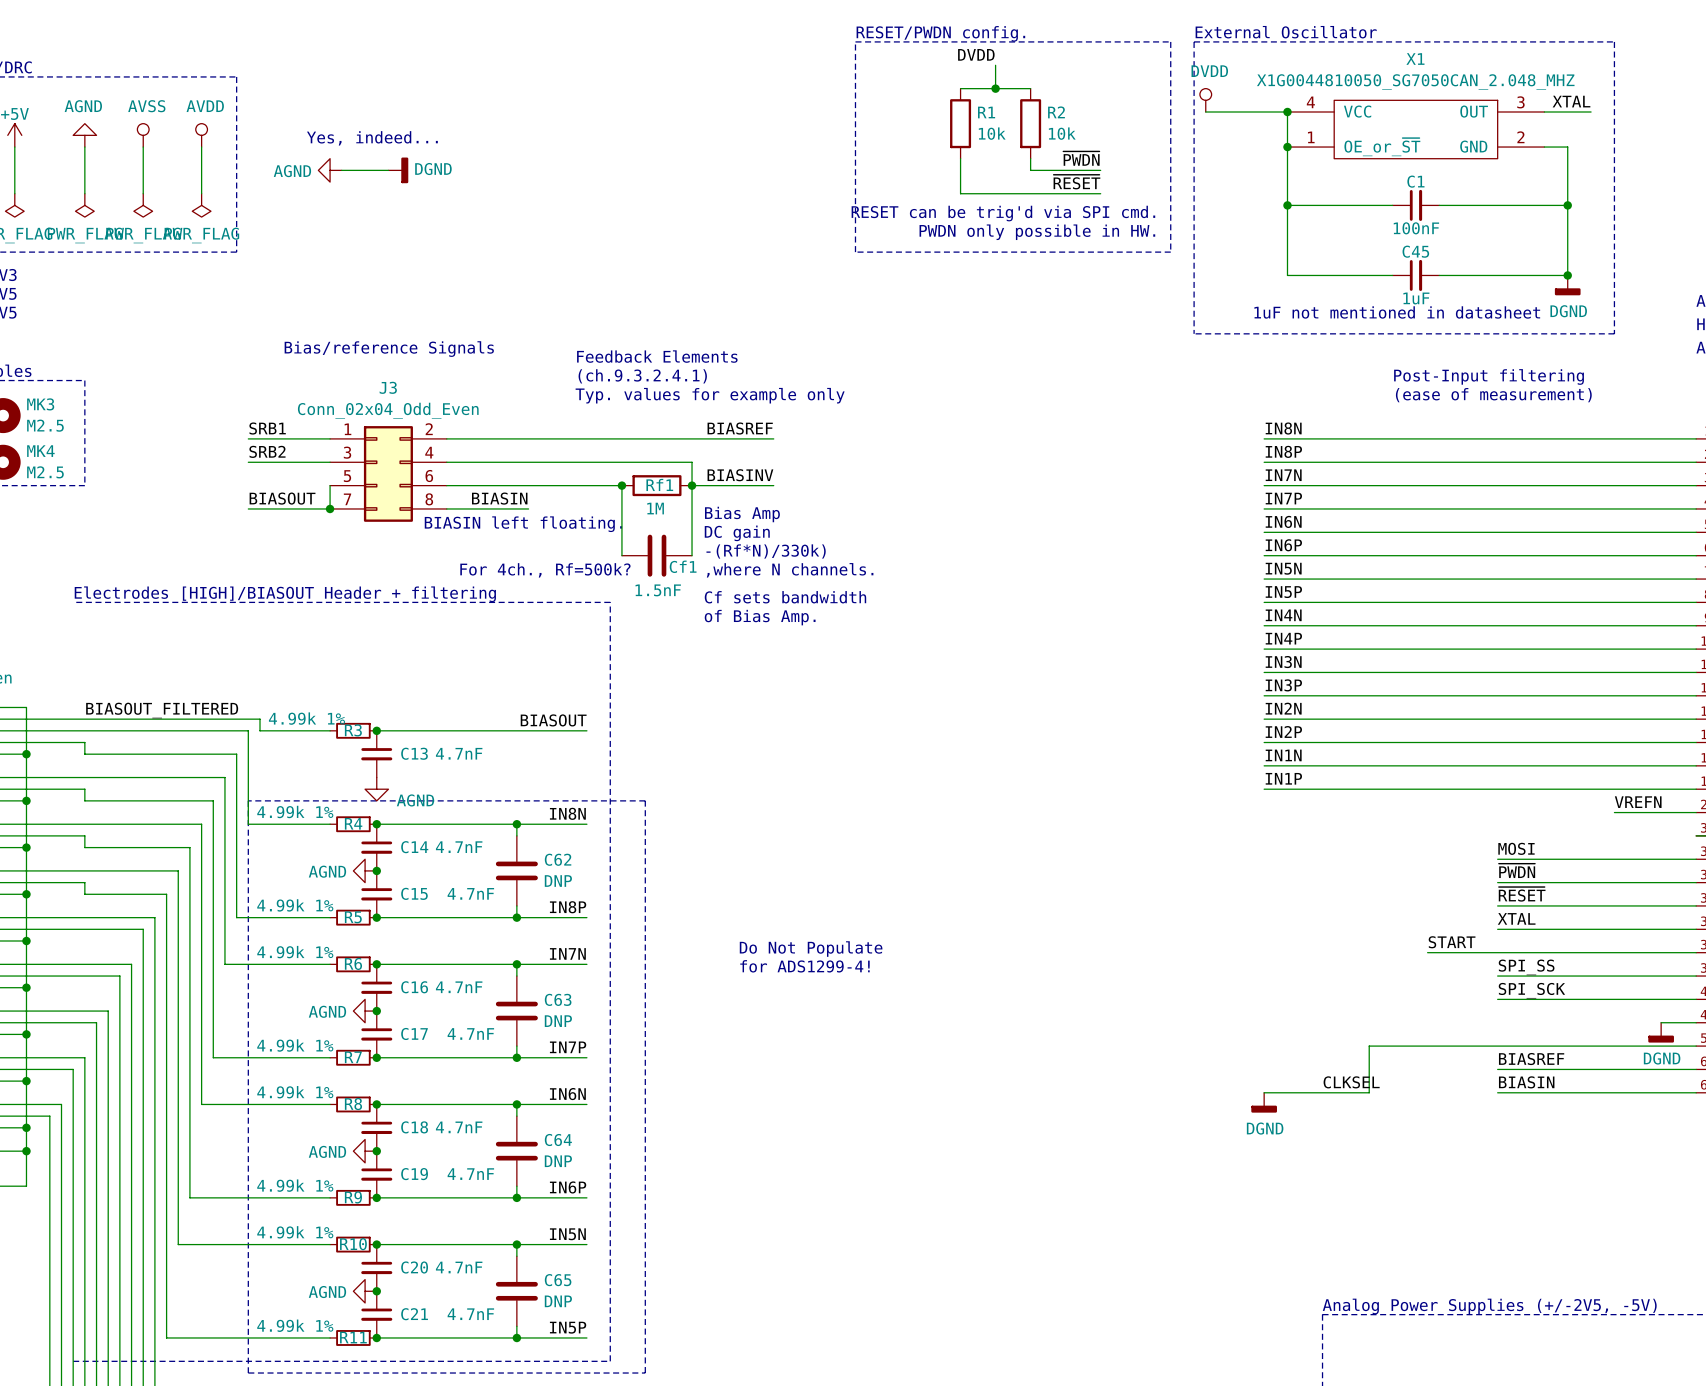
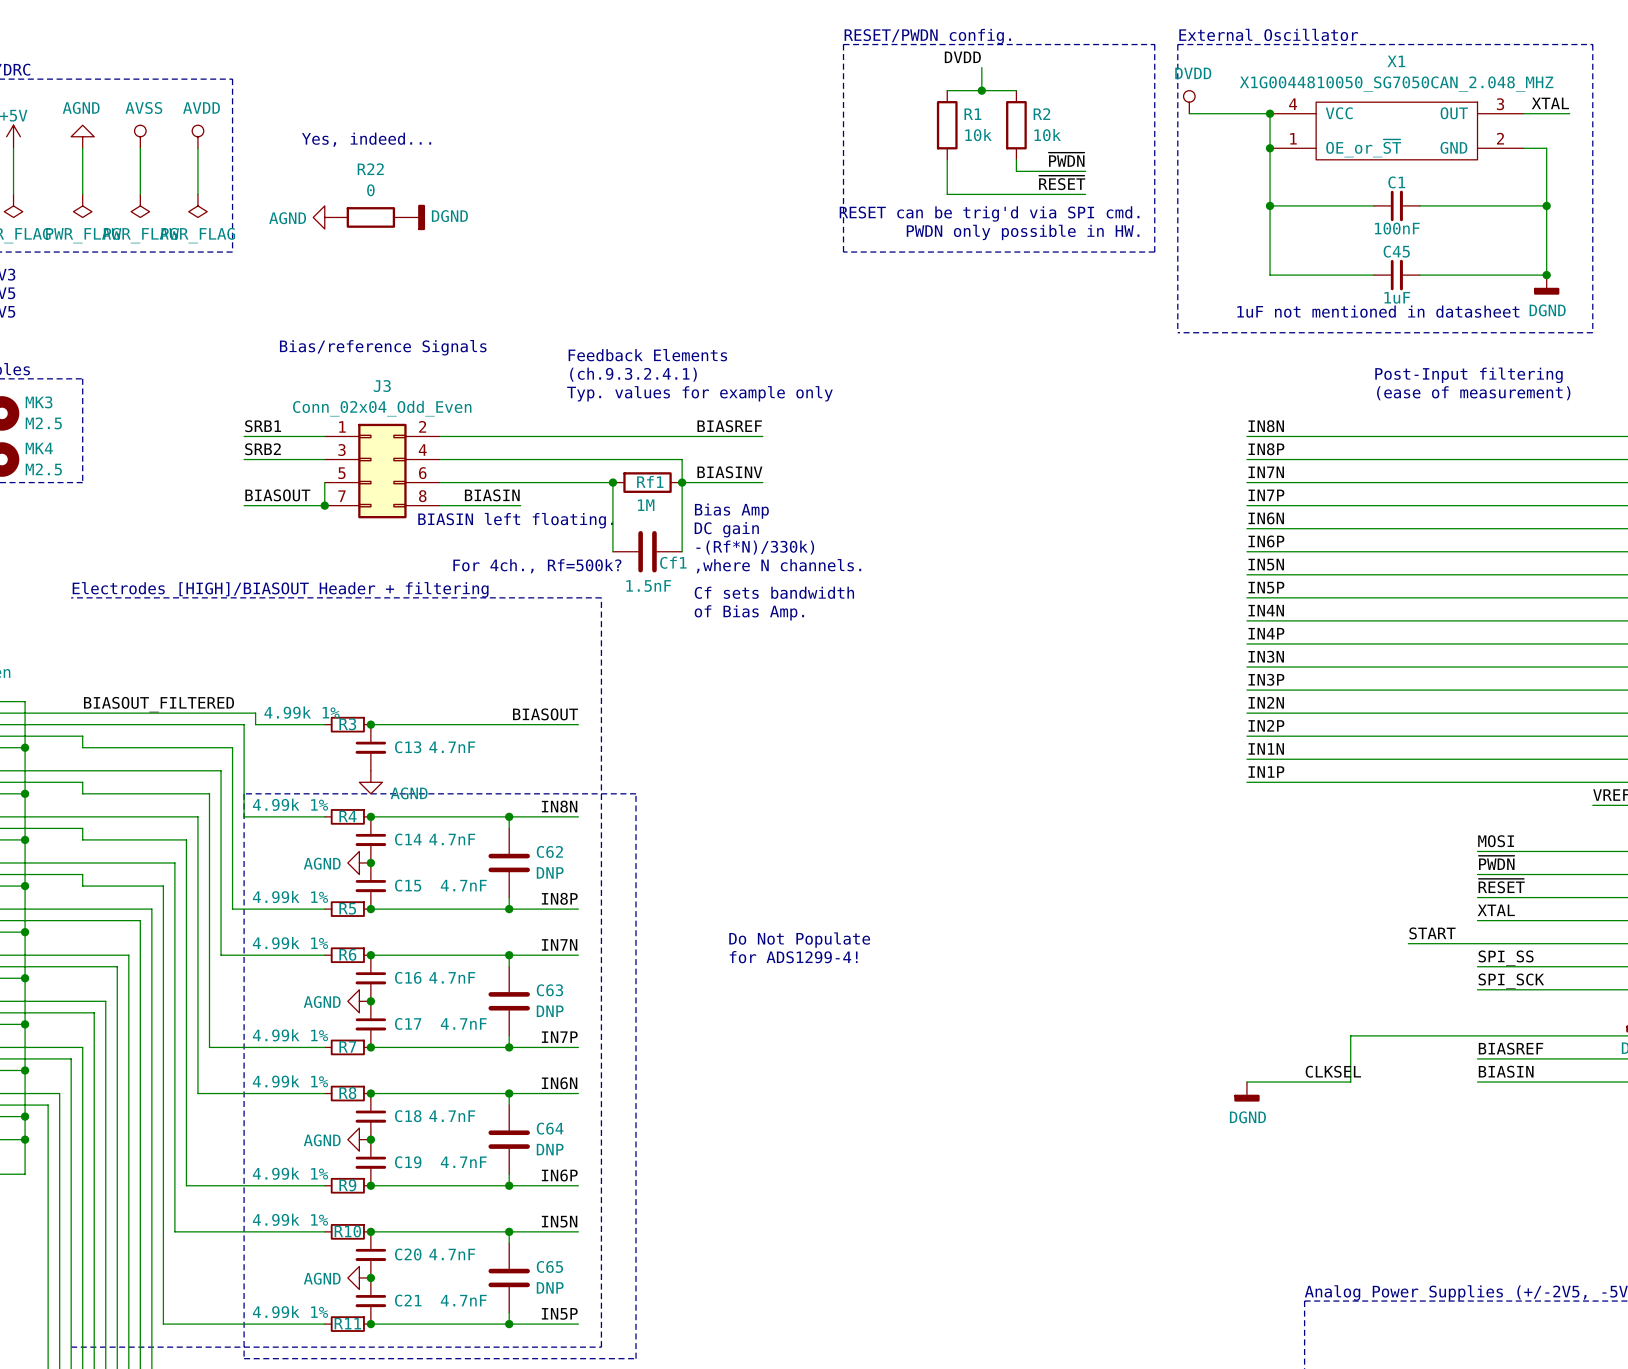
power symbol position: AGND (330, 170) -> AGND (324, 217)
wire: (341, 170) (388, 170) -> none
power symbol position: DGND (398, 170) -> DGND (415, 217)
R22: none -> 0 (370, 217)

